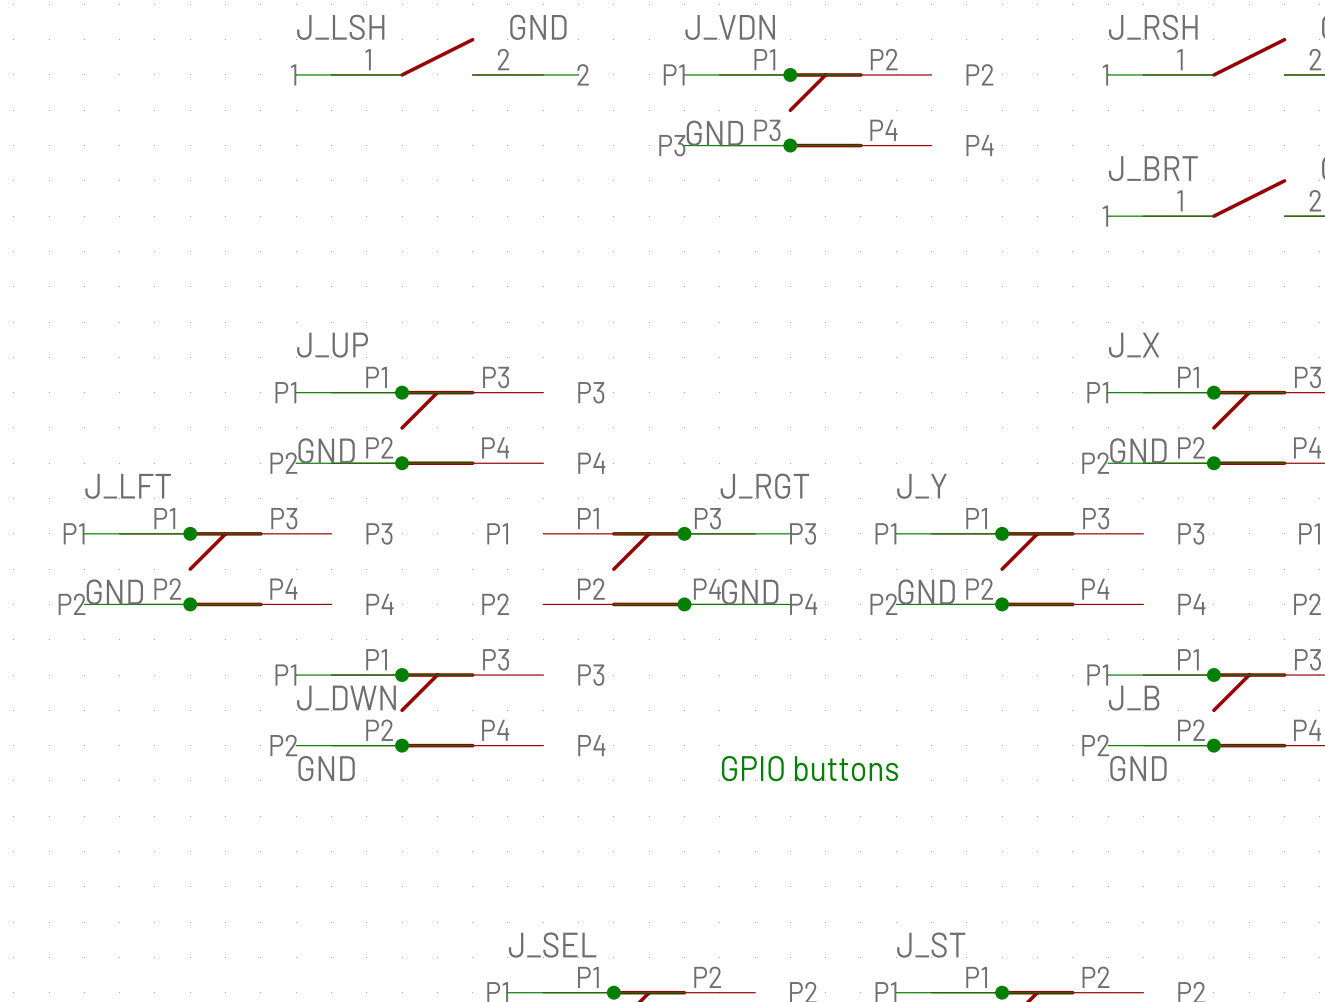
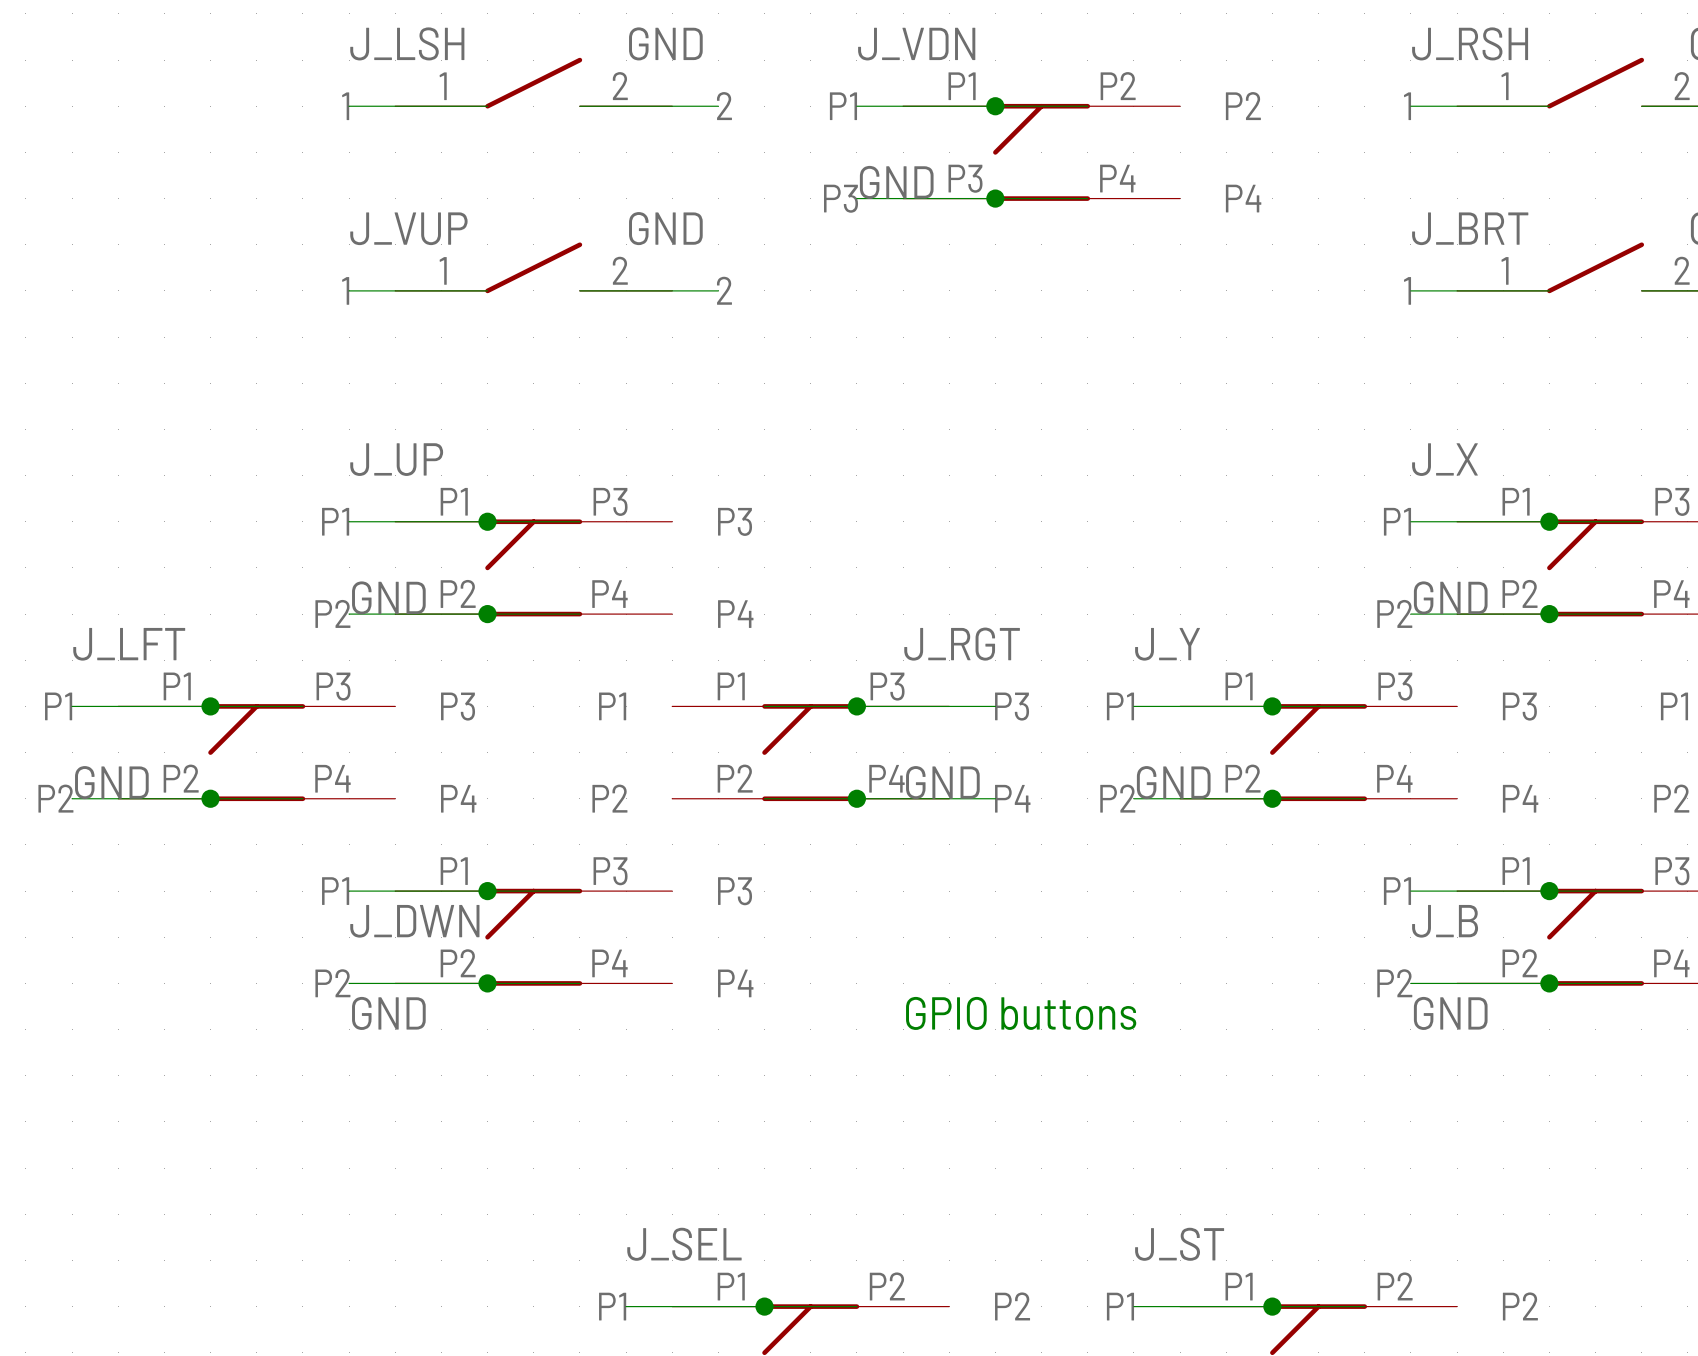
label: none -> J_VUP (408, 228)
label: none -> GND (665, 228)
part: none -> (533, 267)
wire: none -> (349, 290) (487, 290)
wire: none -> (579, 290) (718, 290)

